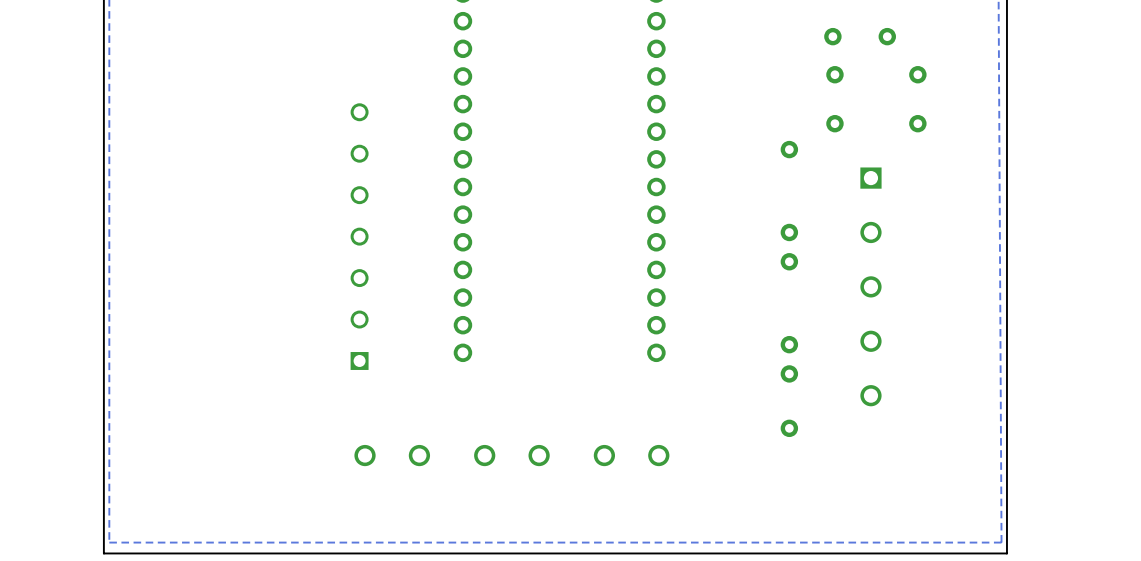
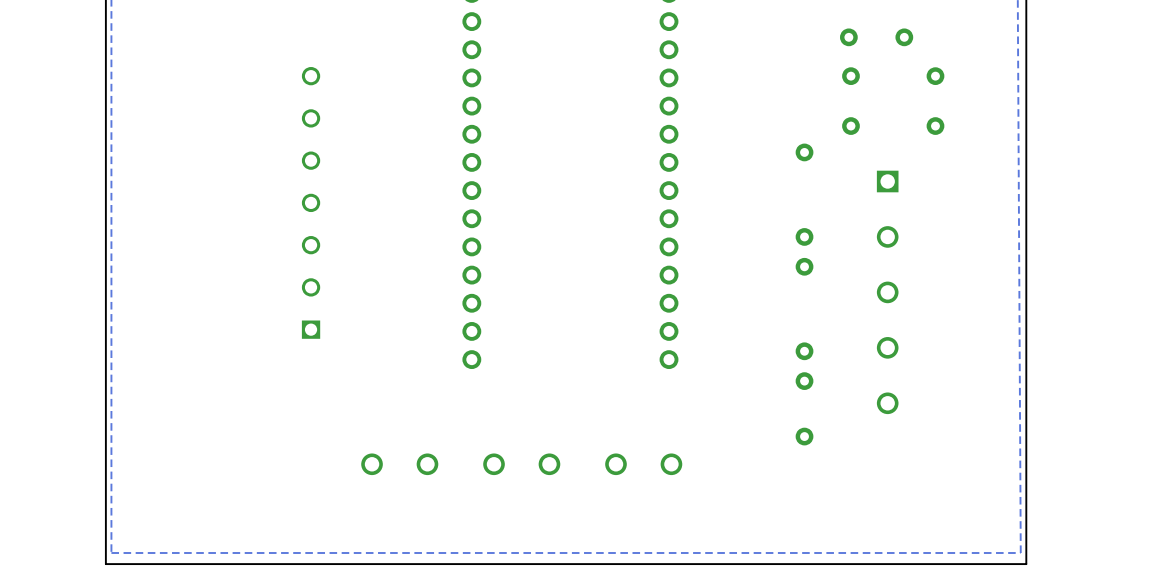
part position: (359, 236) -> (311, 202)

